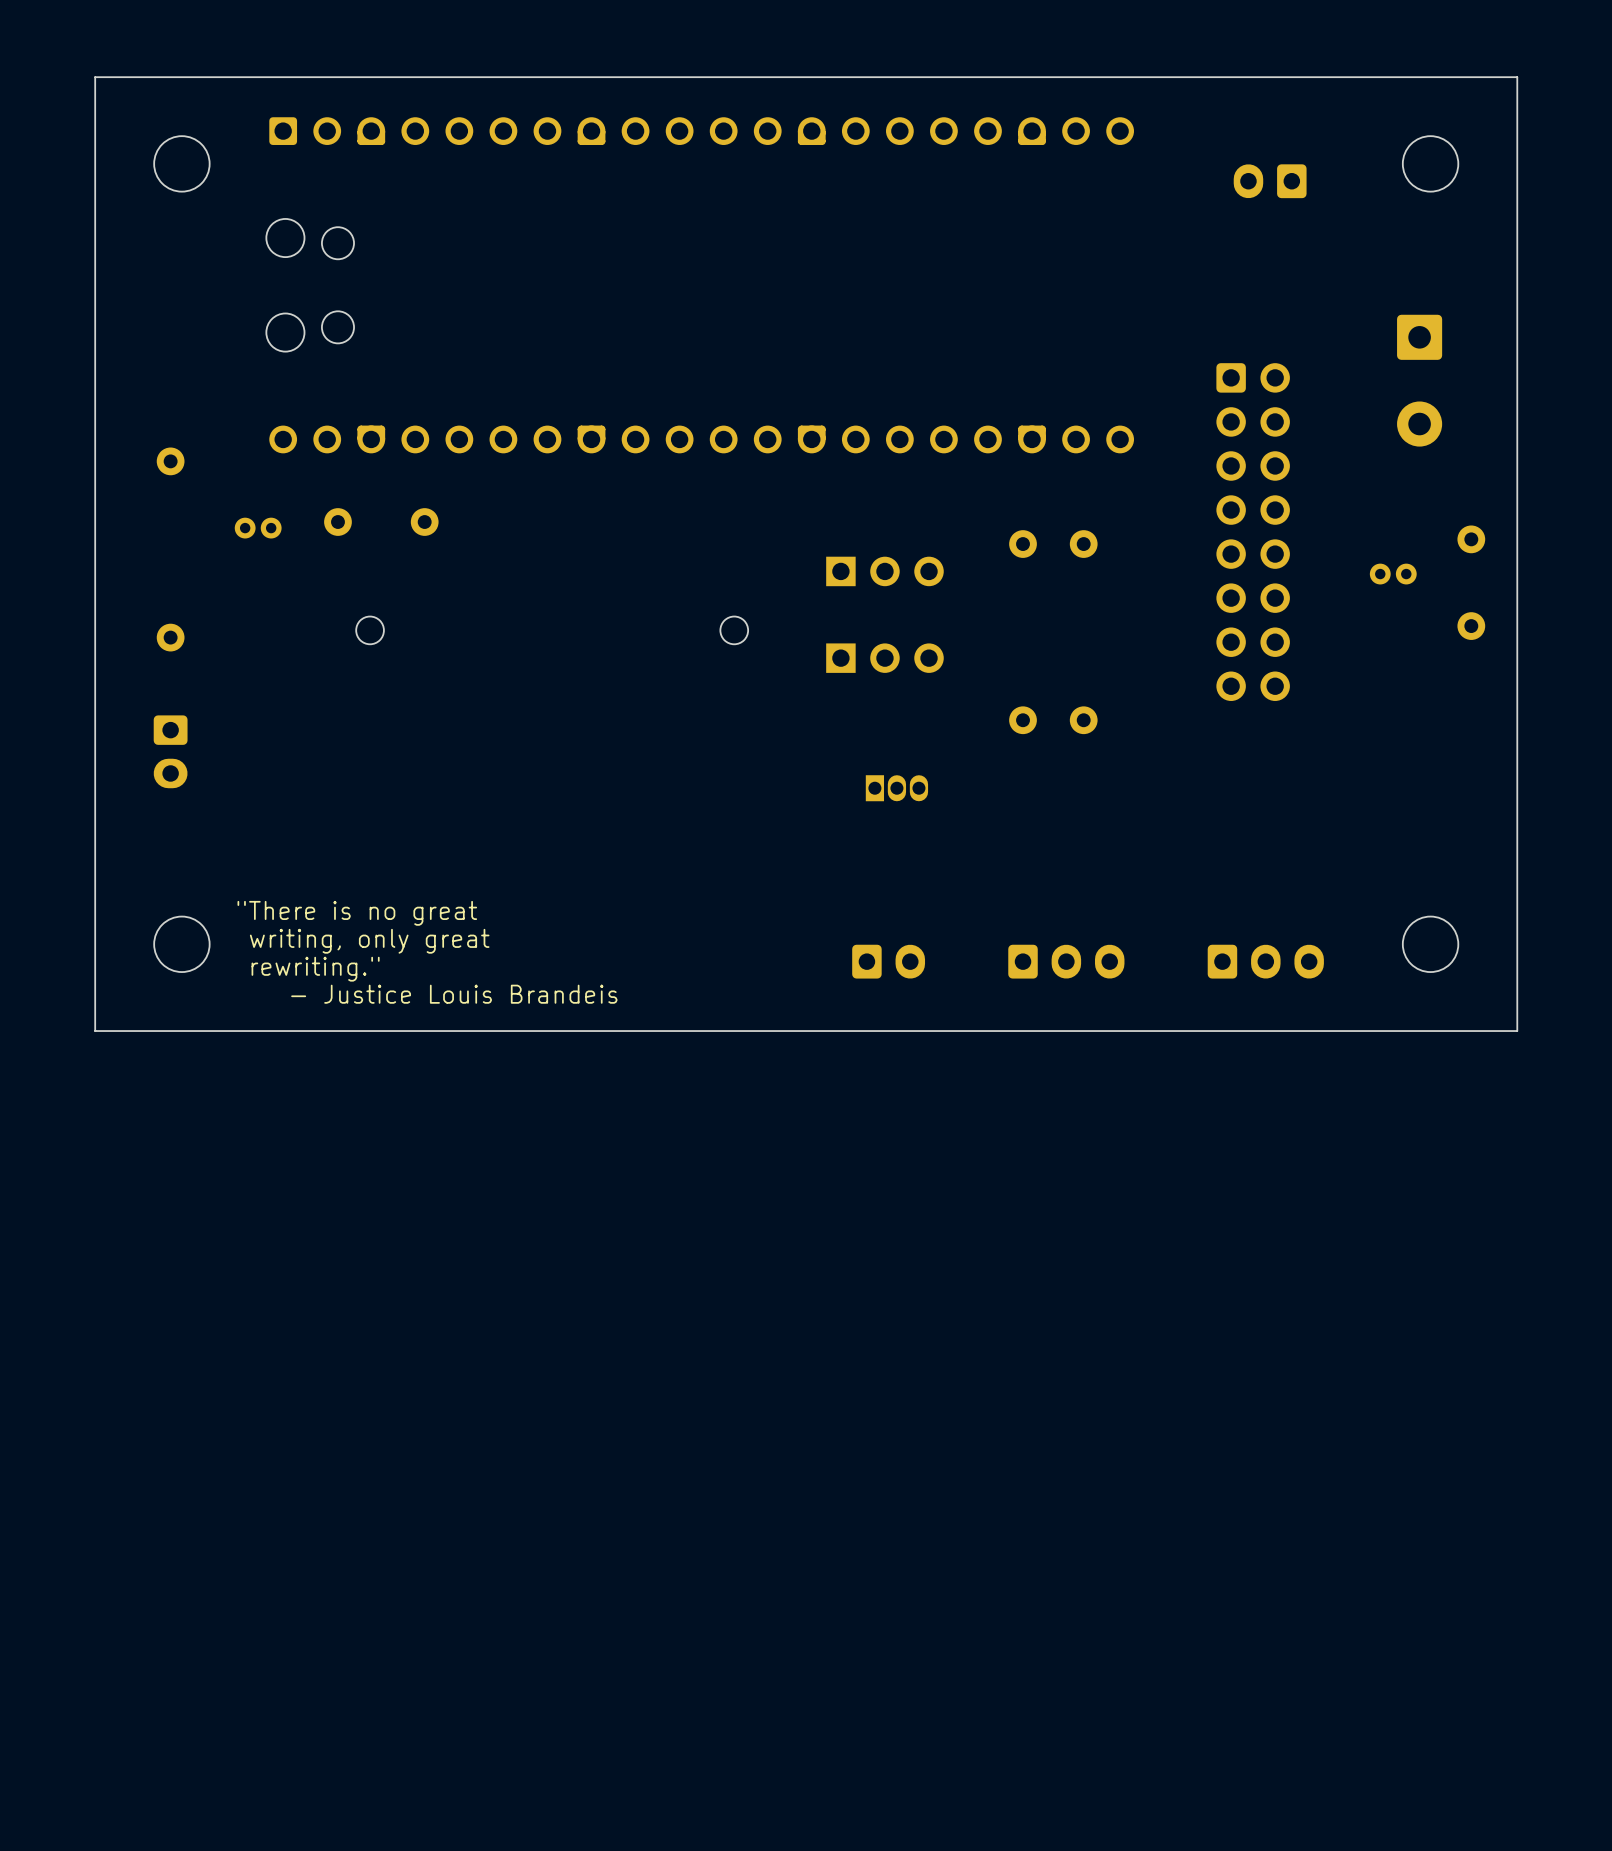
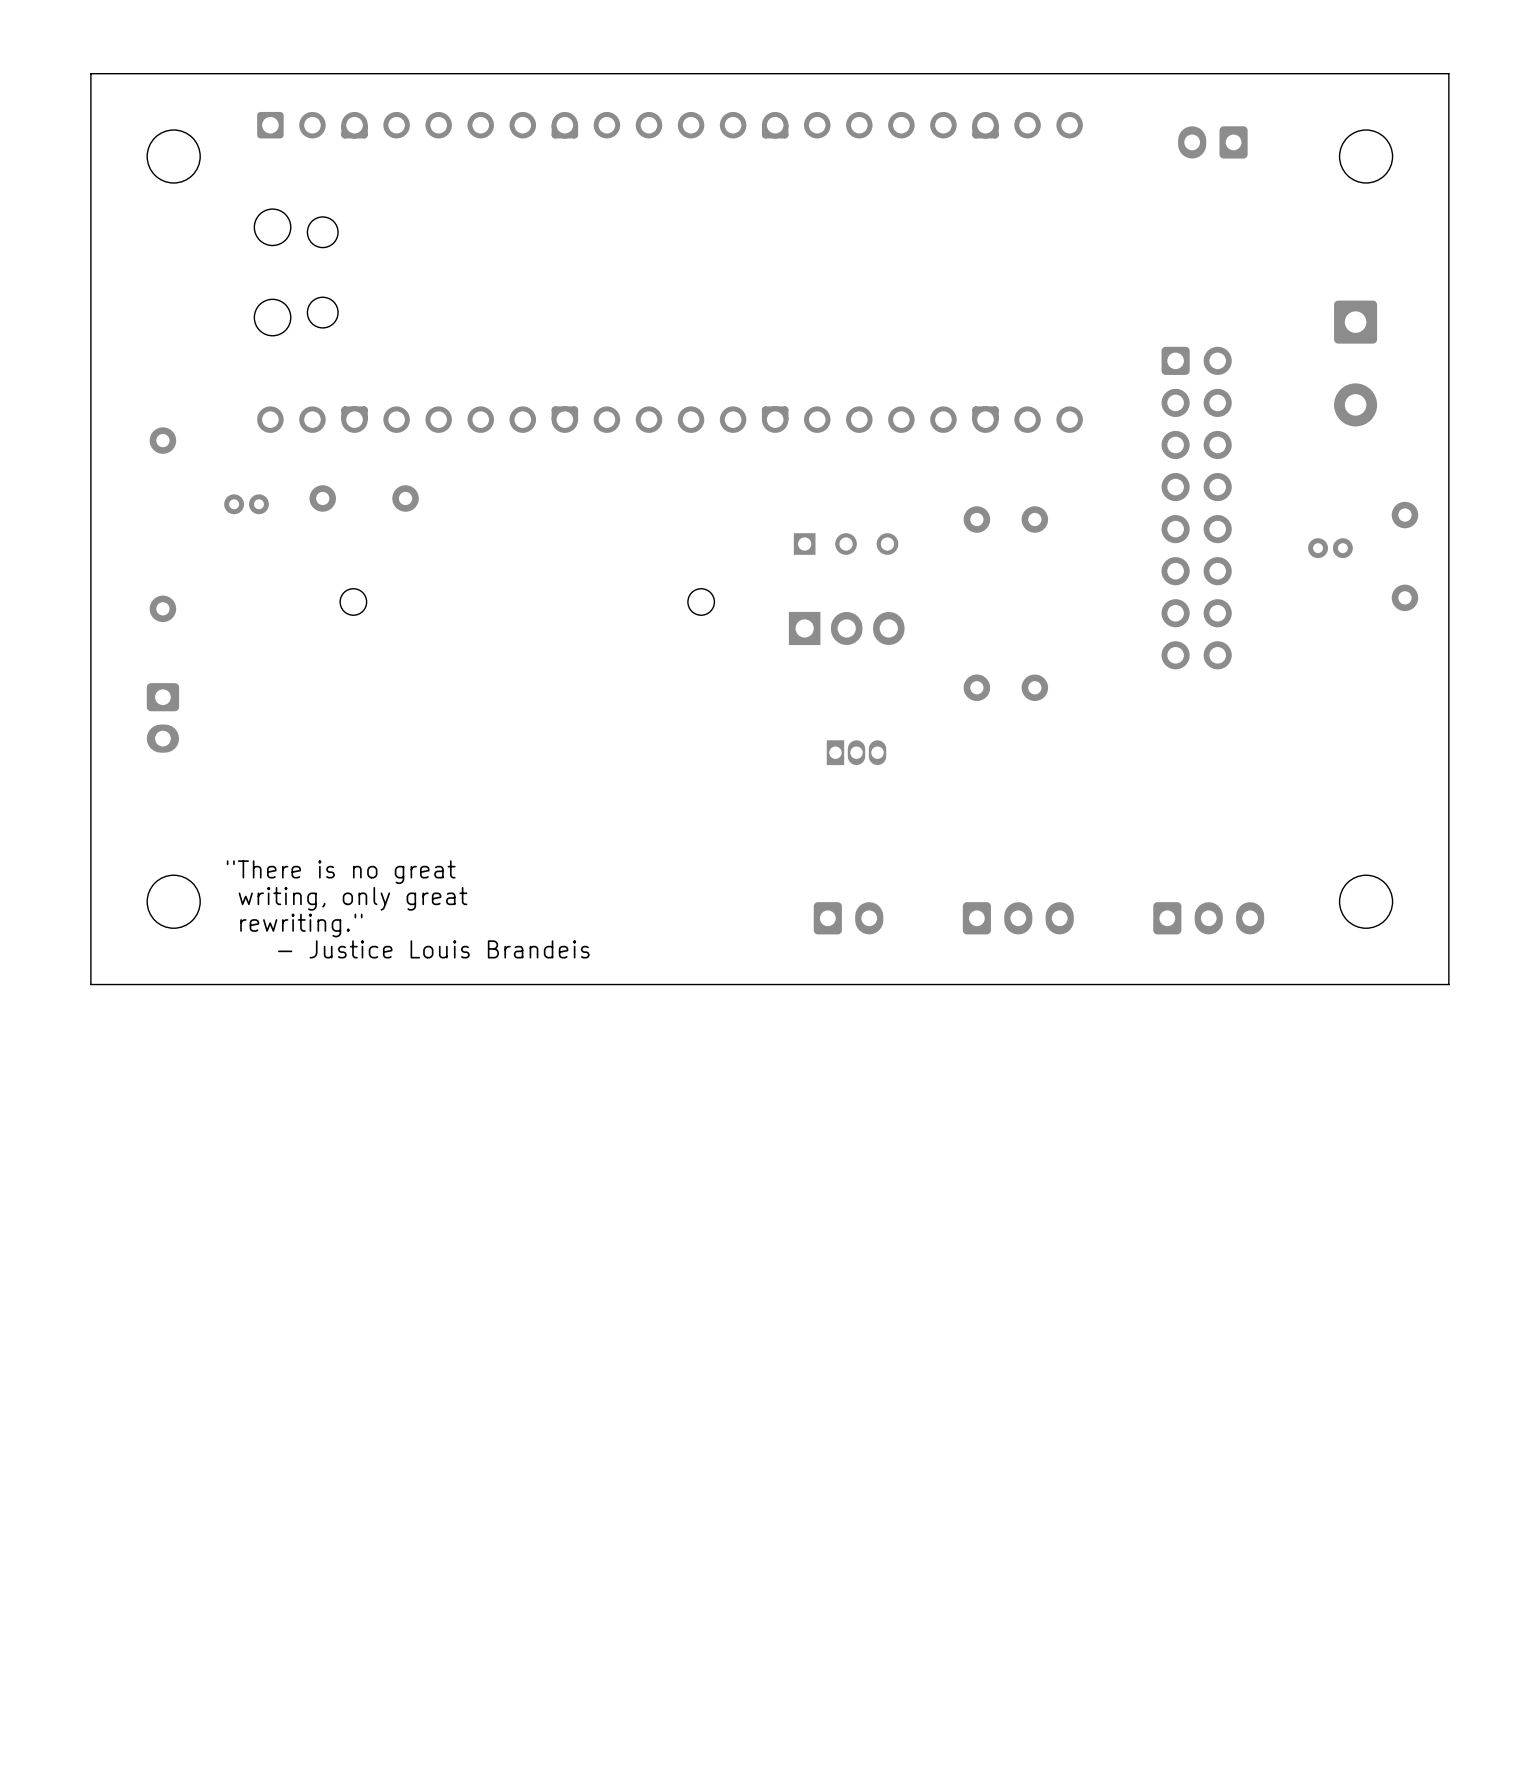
part position: (1270, 181) -> (1212, 142)
part footprint: [826, 556, 944, 587] -> [793, 533, 899, 555]
part footprint: [826, 643, 944, 673] -> [788, 611, 905, 646]

